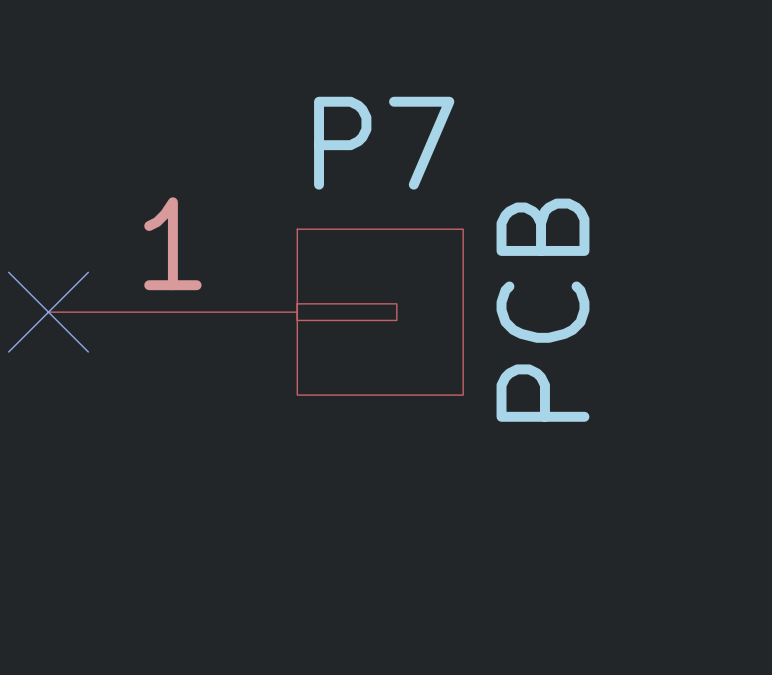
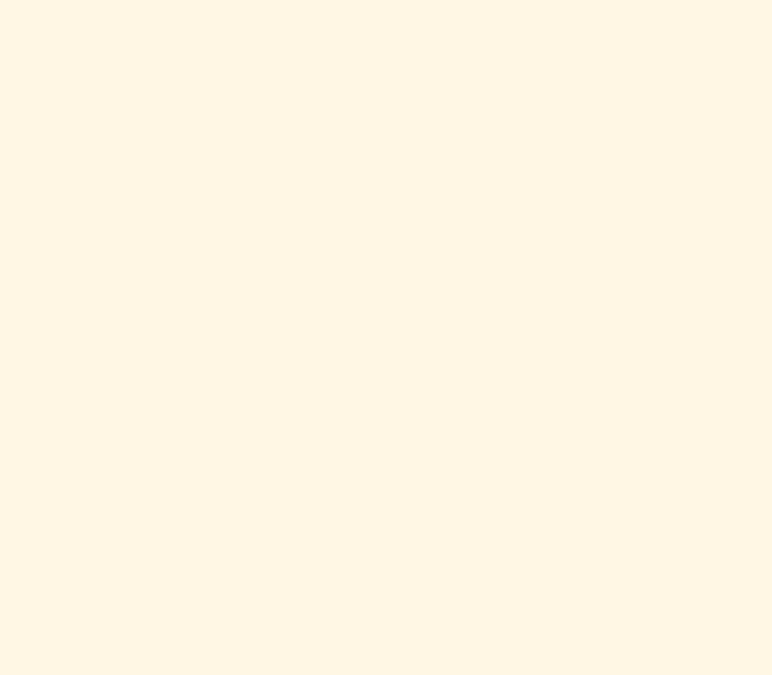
no-connect mark: (48, 312) -> none
P7: PCB (255, 312) -> none

